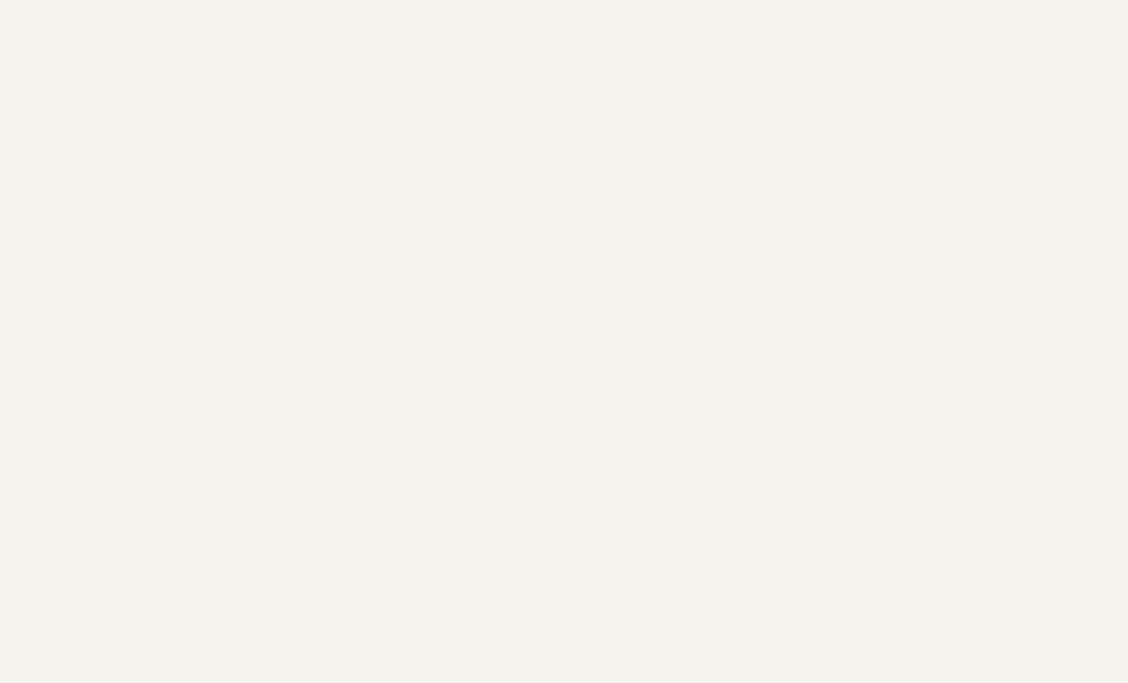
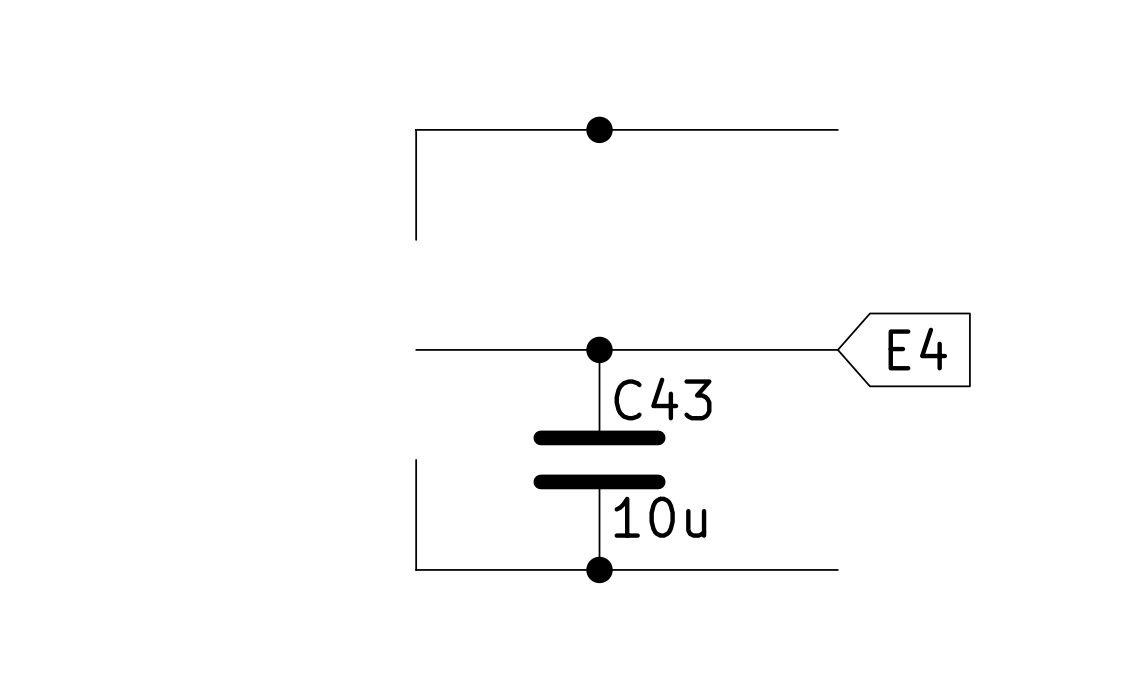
junction: none -> (599, 129)
wire: none -> (837, 129) (416, 129) (416, 239)
wire: none -> (416, 349) (837, 349)
junction: none -> (599, 349)
global label: none -> E4 (917, 349)
wire: none -> (416, 459) (416, 569) (837, 569)
C43: none -> 10u (599, 459)
junction: none -> (599, 569)

